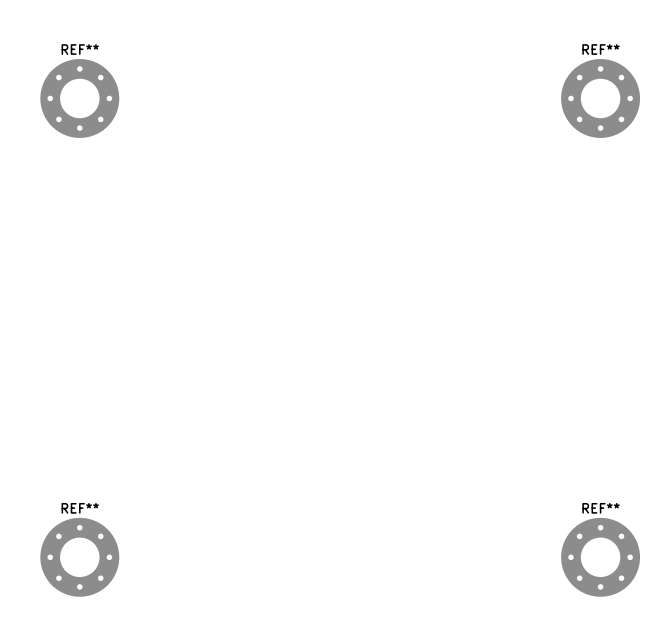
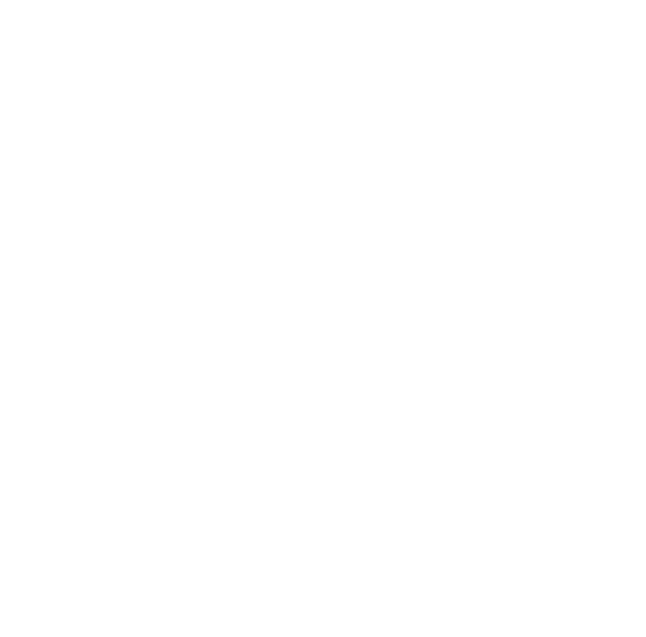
REF**: (79, 98) -> none
REF**: (600, 98) -> none
REF**: (79, 557) -> none
REF**: (600, 557) -> none

